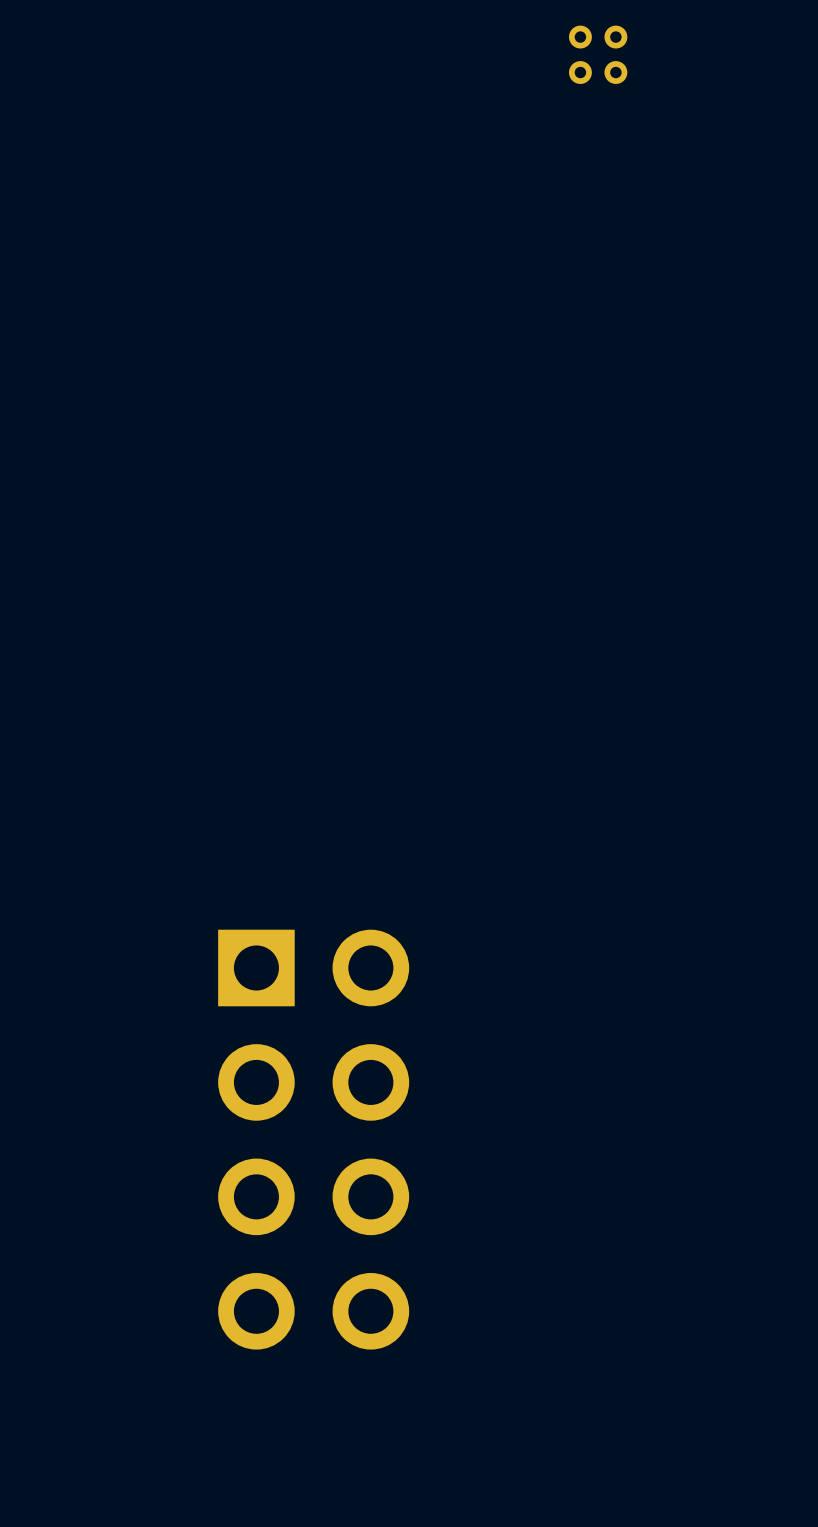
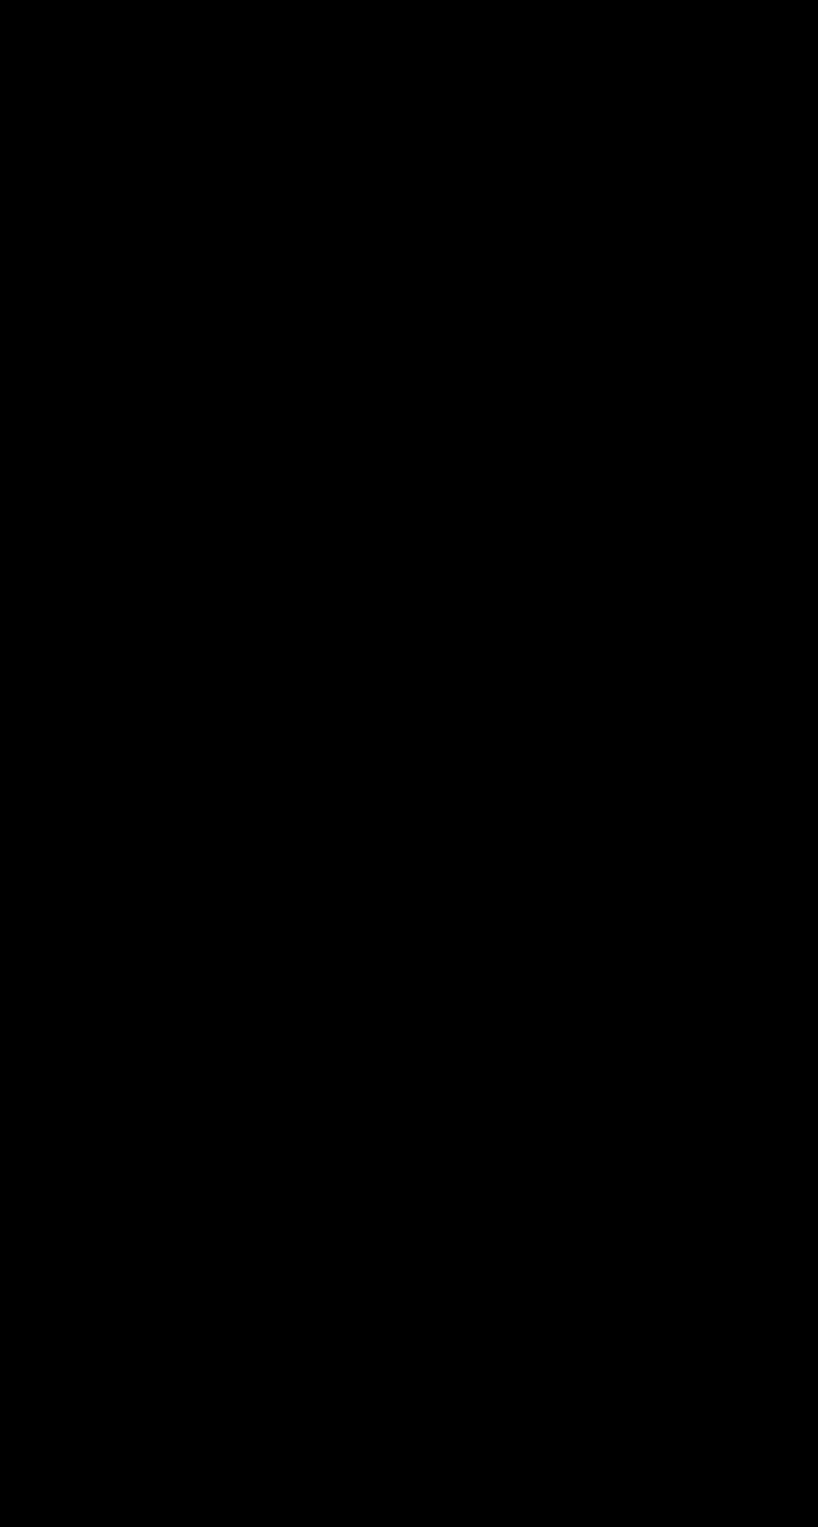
part: (598, 54) -> none
part: (313, 1139) -> none

